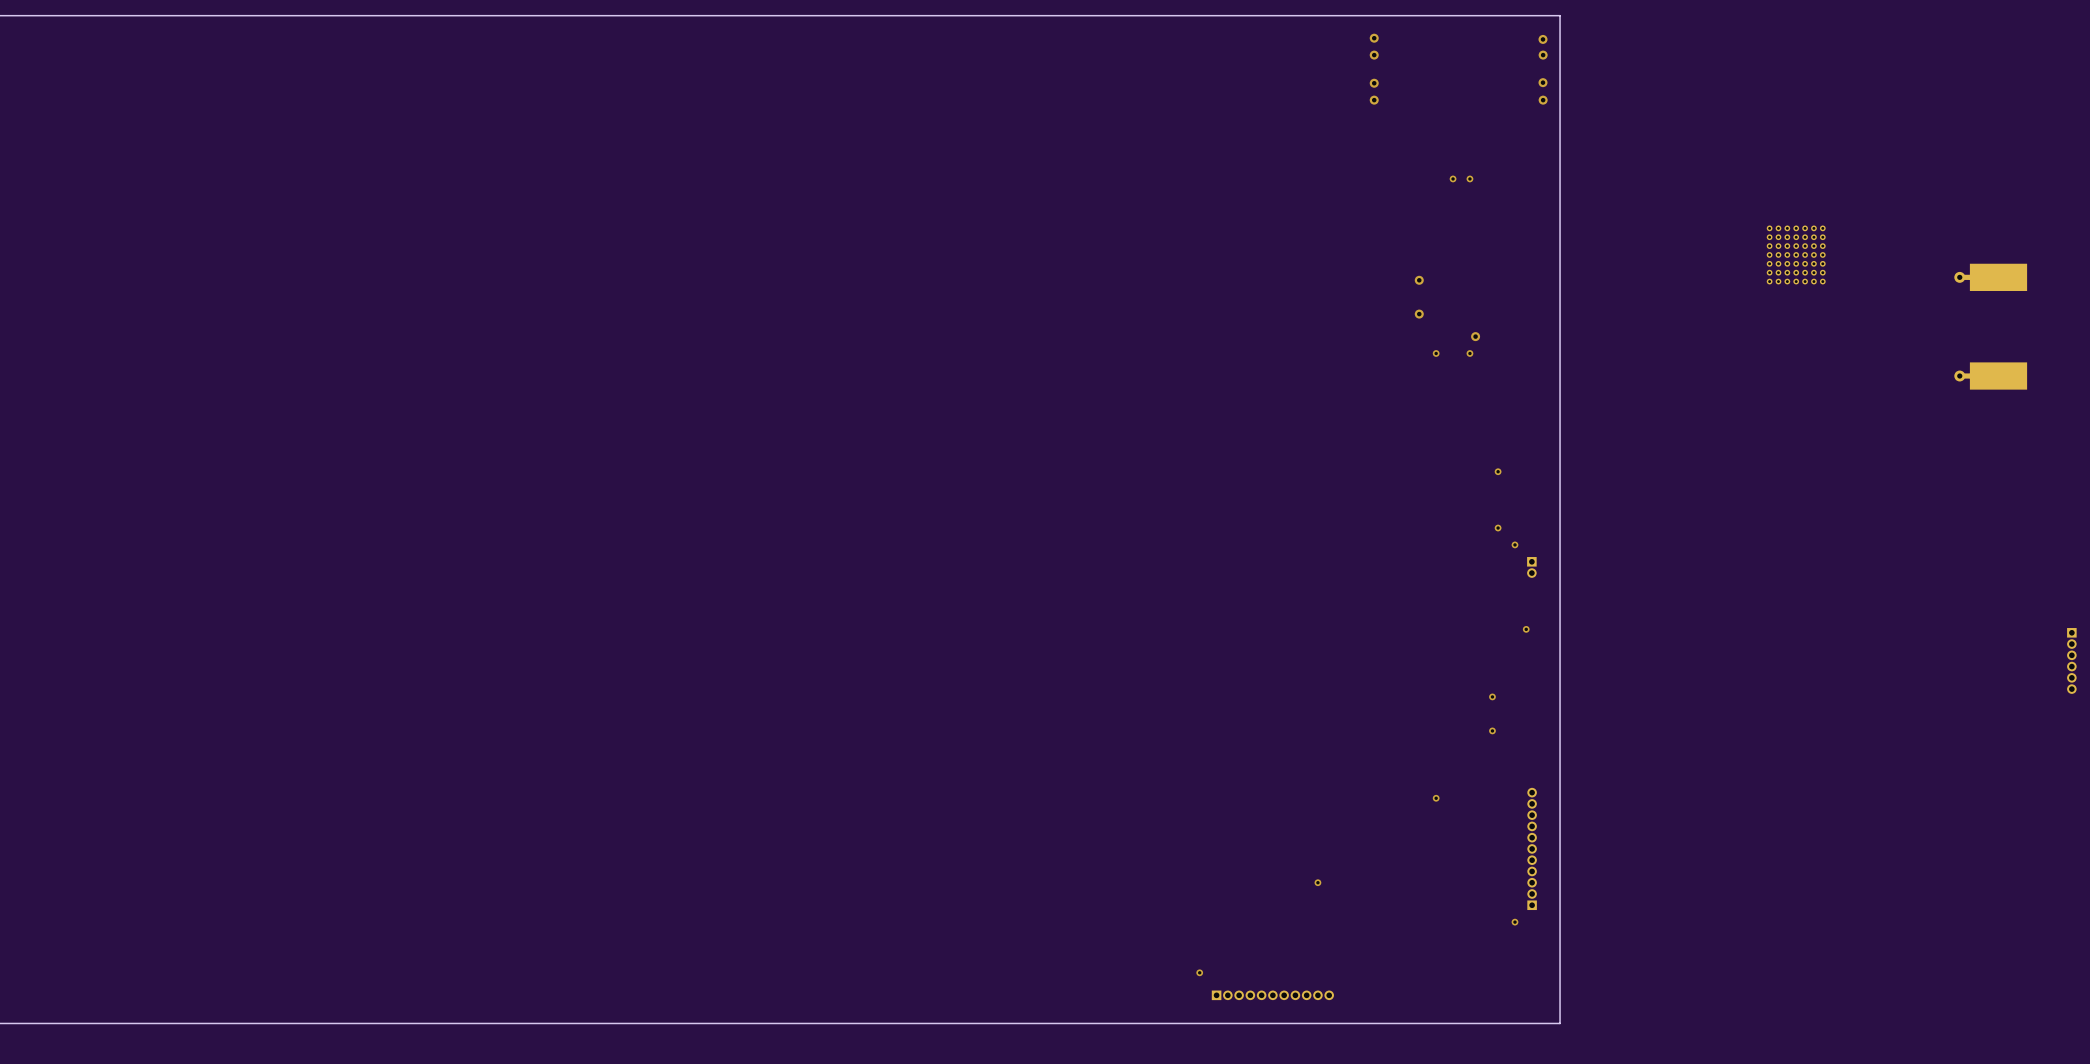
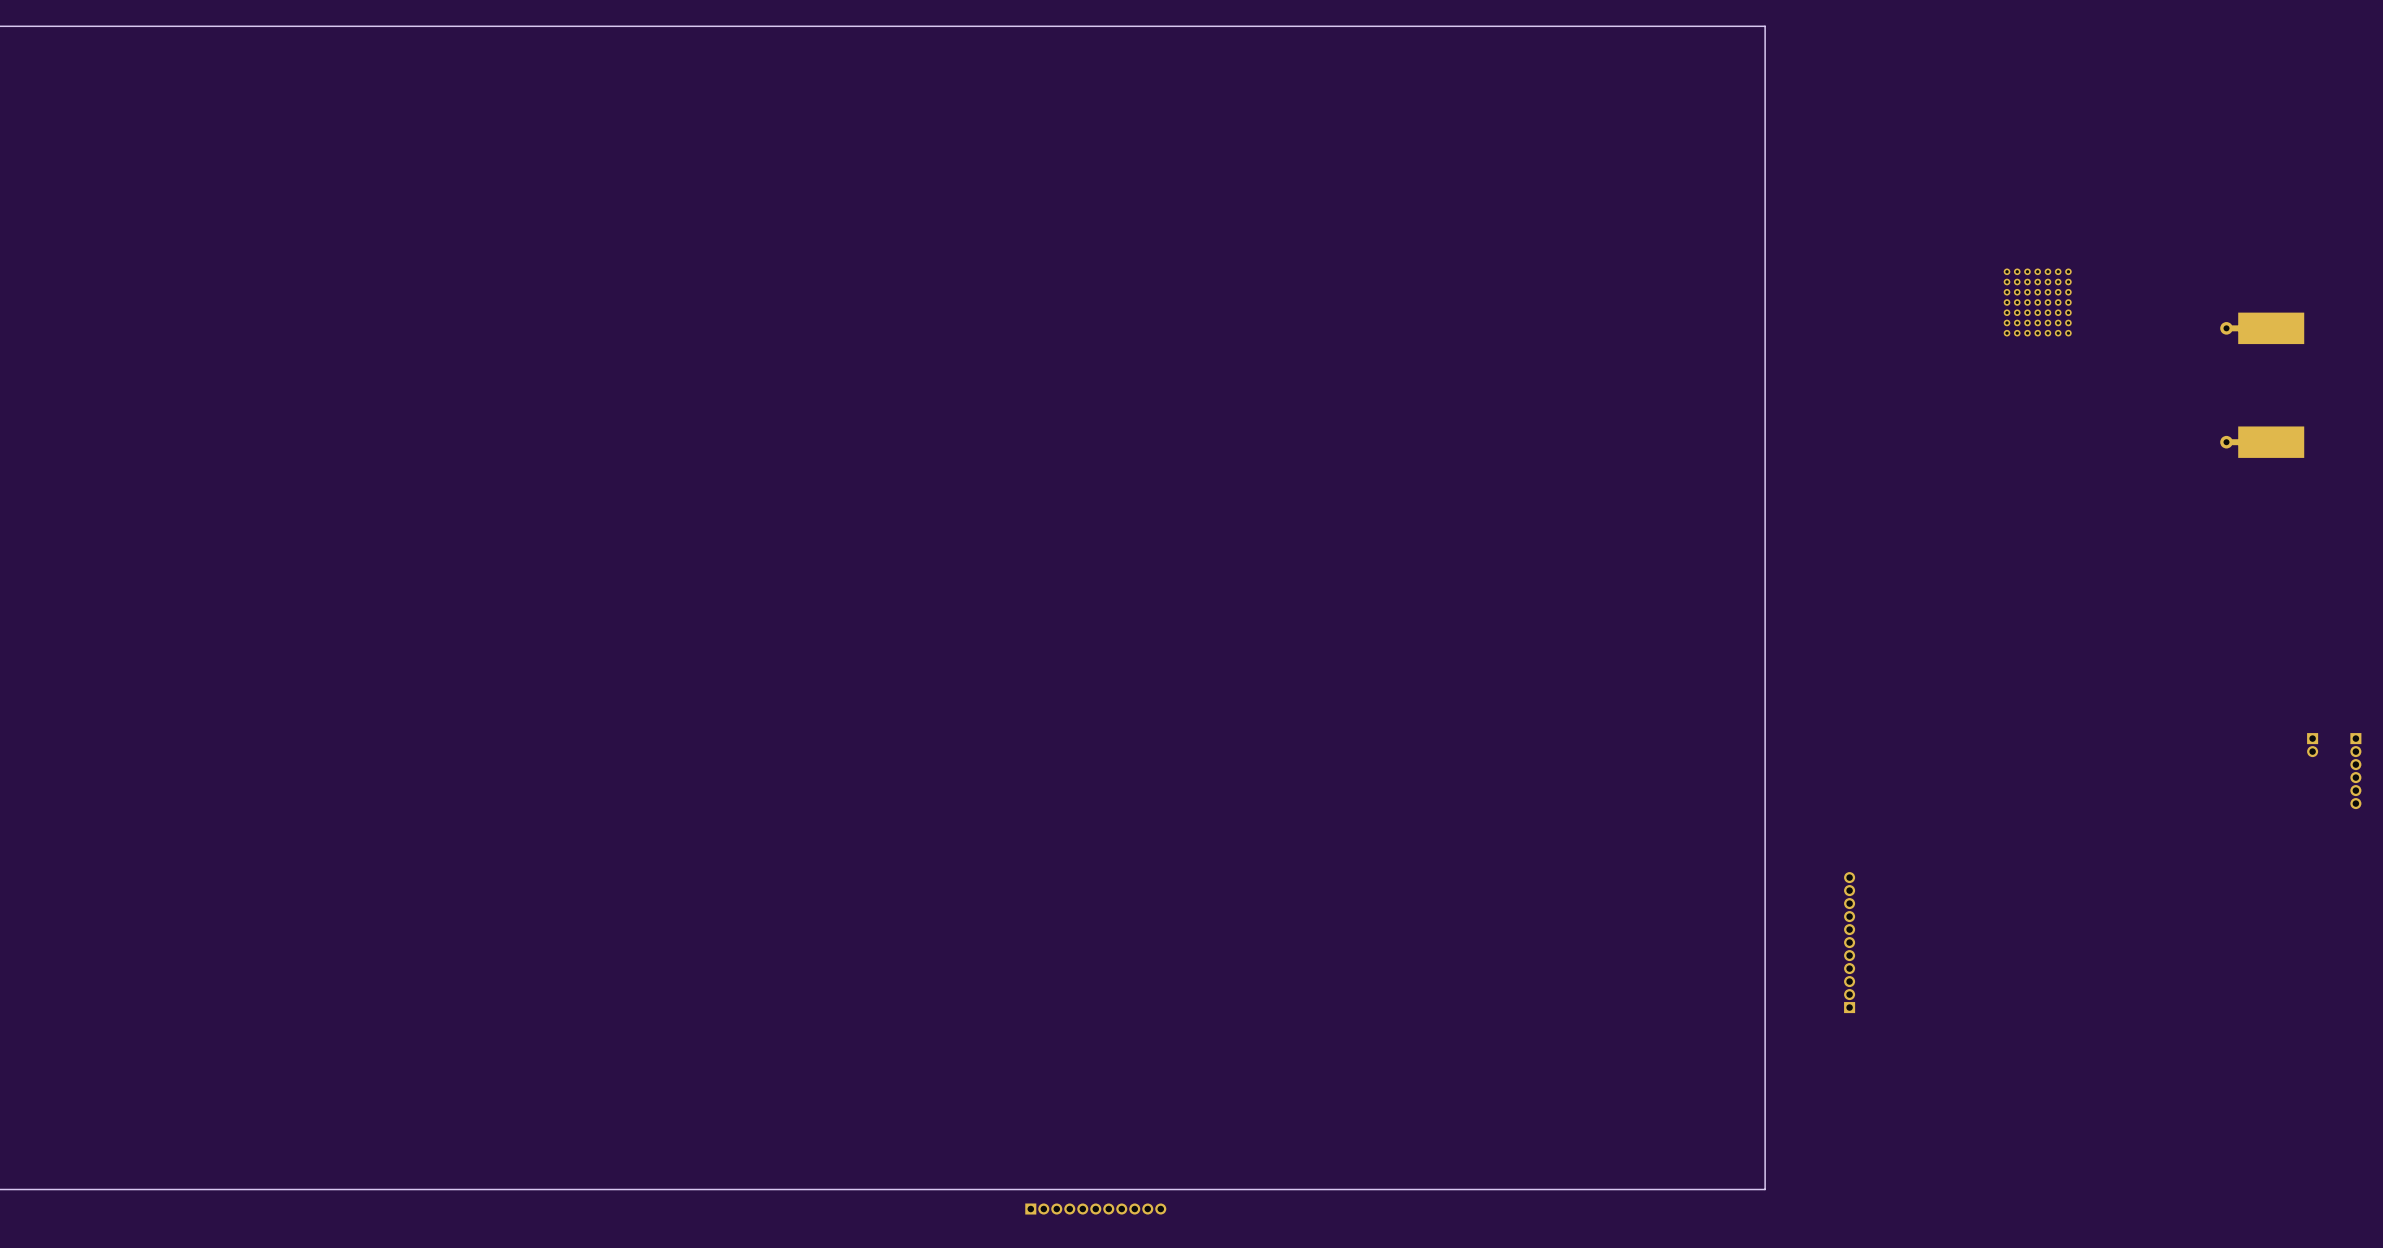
via: (1374, 38) -> none
via: (1543, 39) -> none
via: (1374, 55) -> none
via: (1543, 55) -> none
via: (1543, 82) -> none
via: (1374, 83) -> none
via: (1374, 100) -> none
via: (1543, 100) -> none
via: (1453, 178) -> none
via: (1469, 178) -> none
via: (1419, 280) -> none
via: (1419, 314) -> none
via: (1475, 336) -> none
via: (1436, 353) -> none
via: (1469, 353) -> none
via: (1498, 471) -> none
via: (1498, 528) -> none
via: (1514, 544) -> none
part: (1531, 567) -> none
via: (1526, 629) -> none
part: none -> (2312, 745)
via: (1492, 696) -> none
via: (1492, 730) -> none
via: (1436, 798) -> none
part position: (1532, 848) -> (1849, 942)
via: (1317, 882) -> none
via: (1514, 922) -> none
via: (1199, 972) -> none
part: (1272, 995) -> none
part: none -> (1095, 1209)

